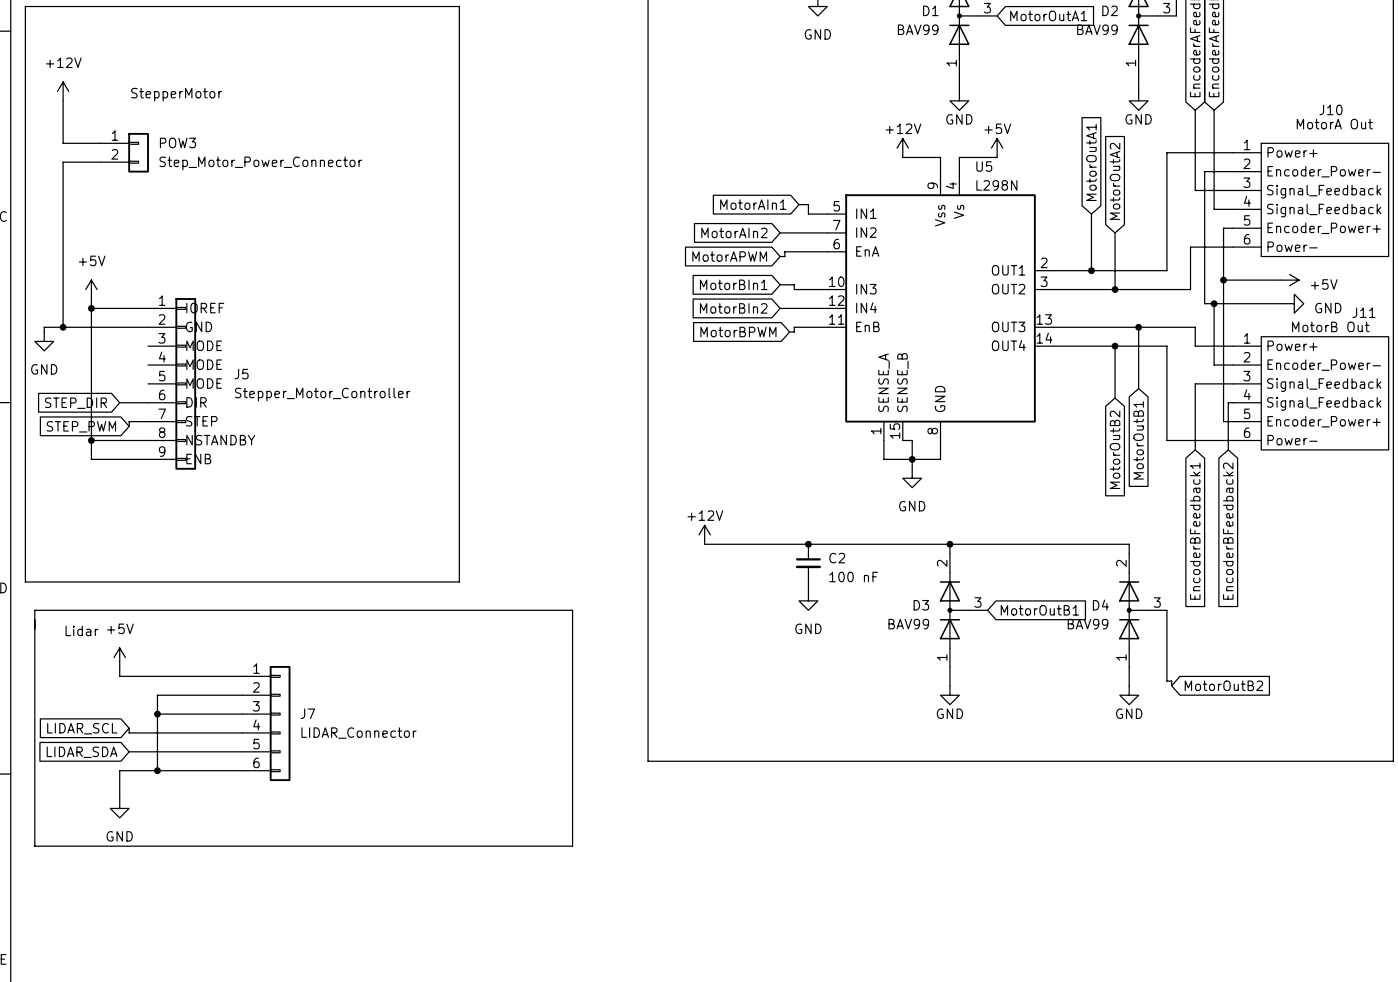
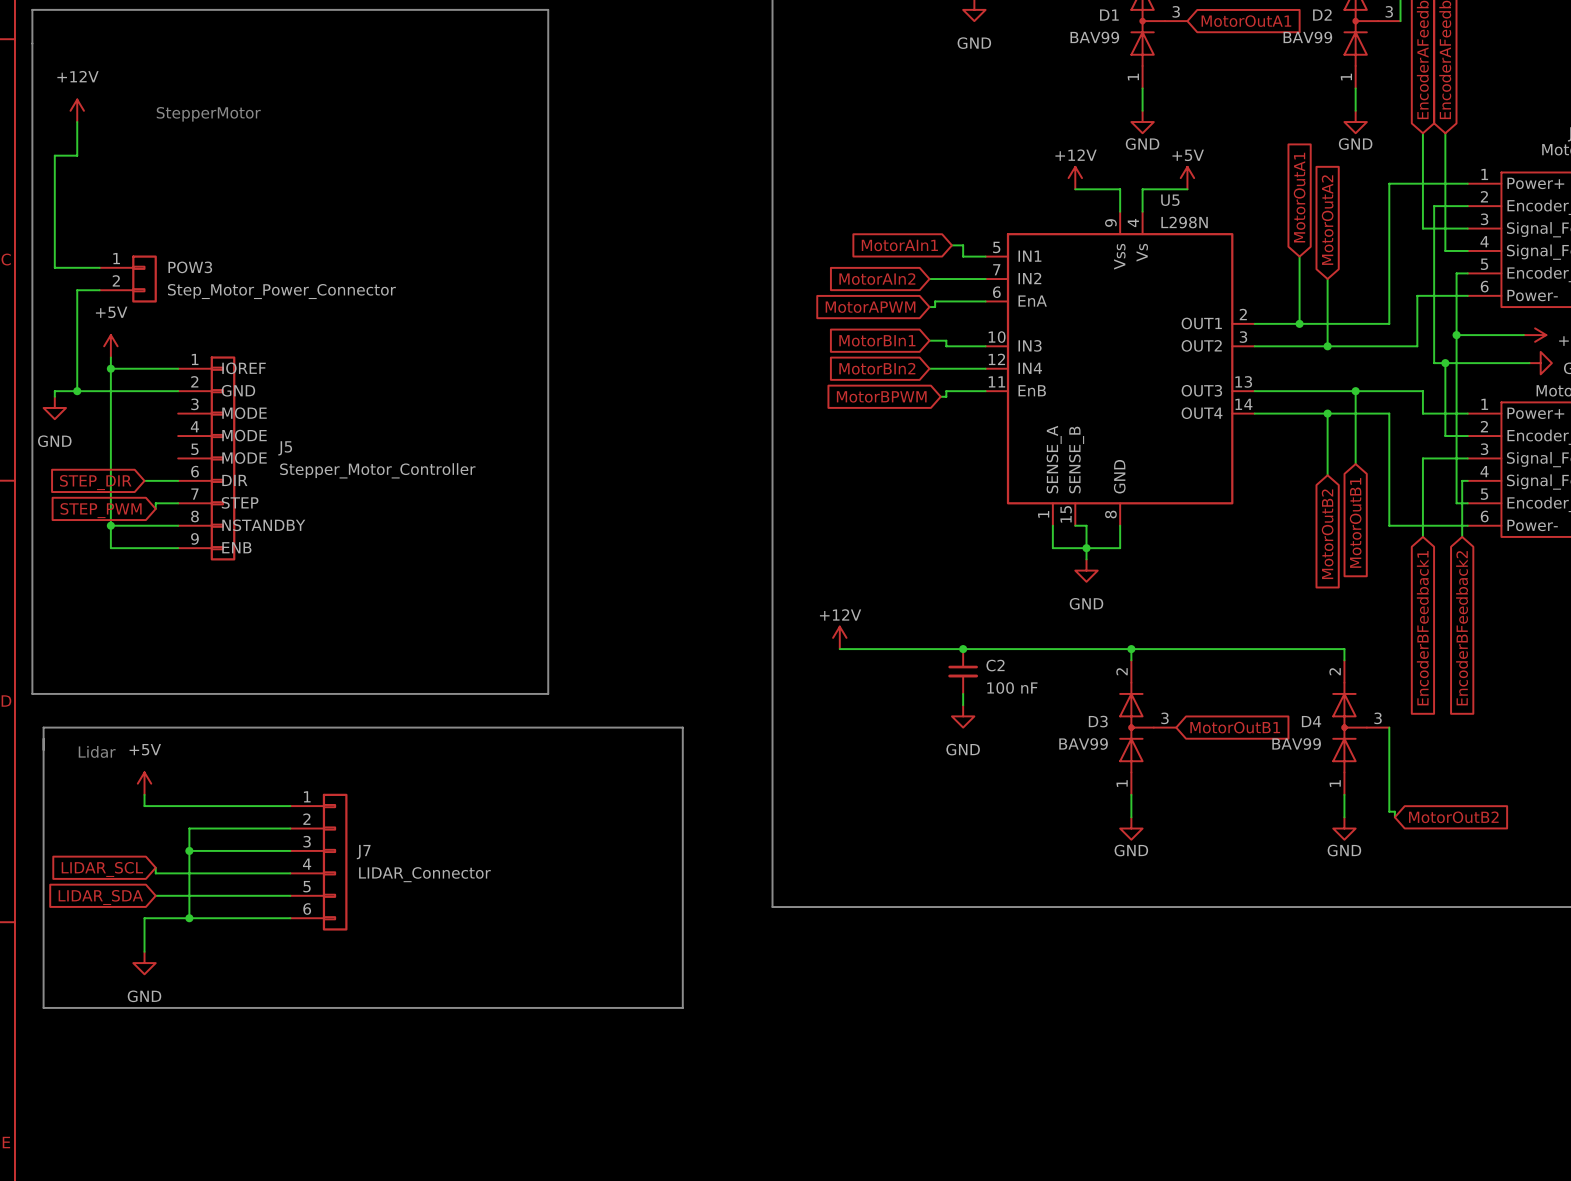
wire: (63, 129) (63, 143) (100, 143) -> (77, 155) (54, 155) (54, 267) (99, 267)
POW3 position: (124, 152) -> (128, 279)
wire: (100, 162) (63, 162) (63, 242) -> (99, 290) (77, 290)

